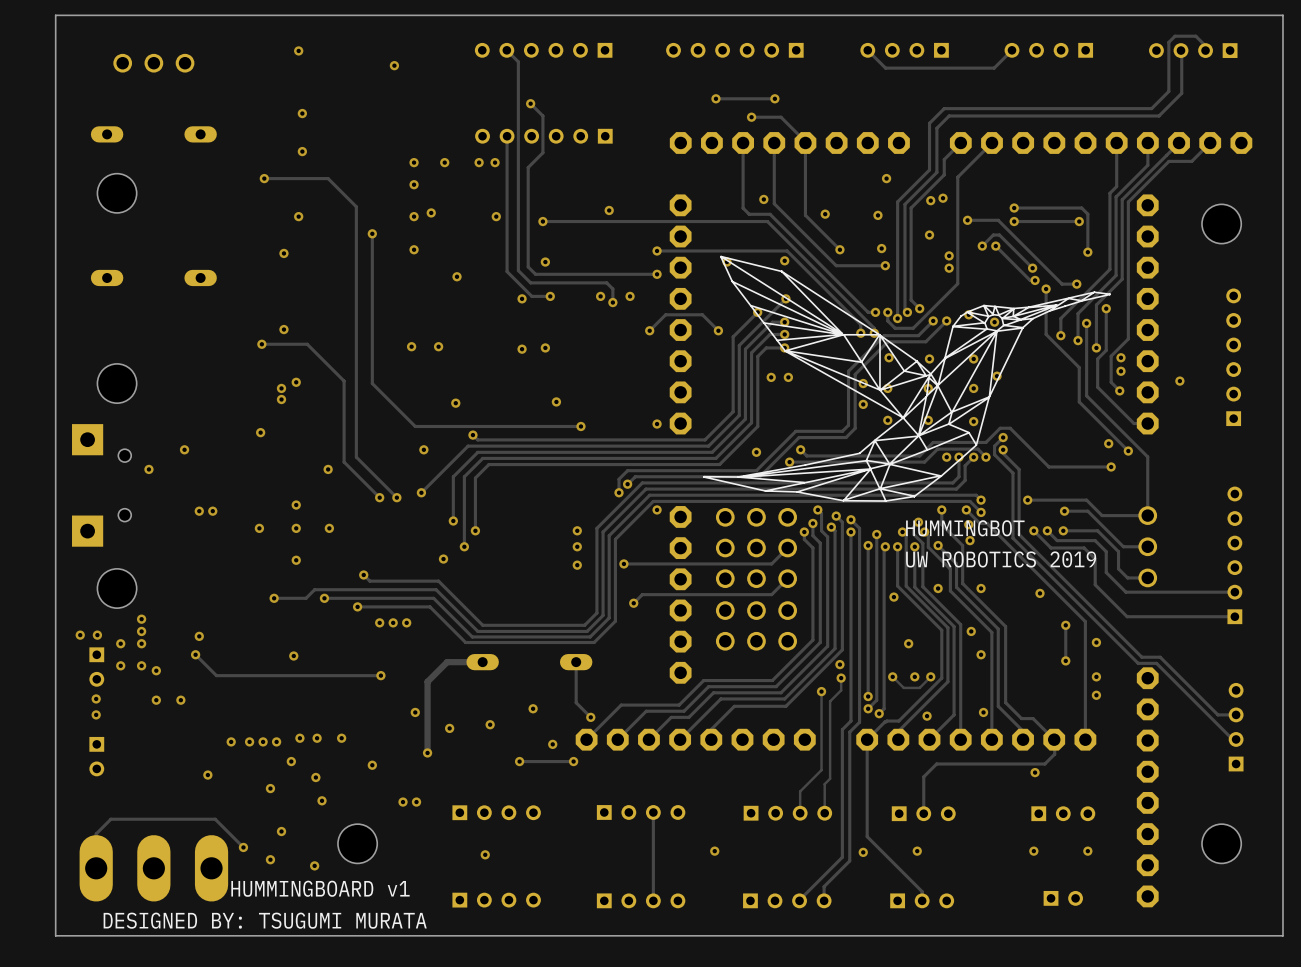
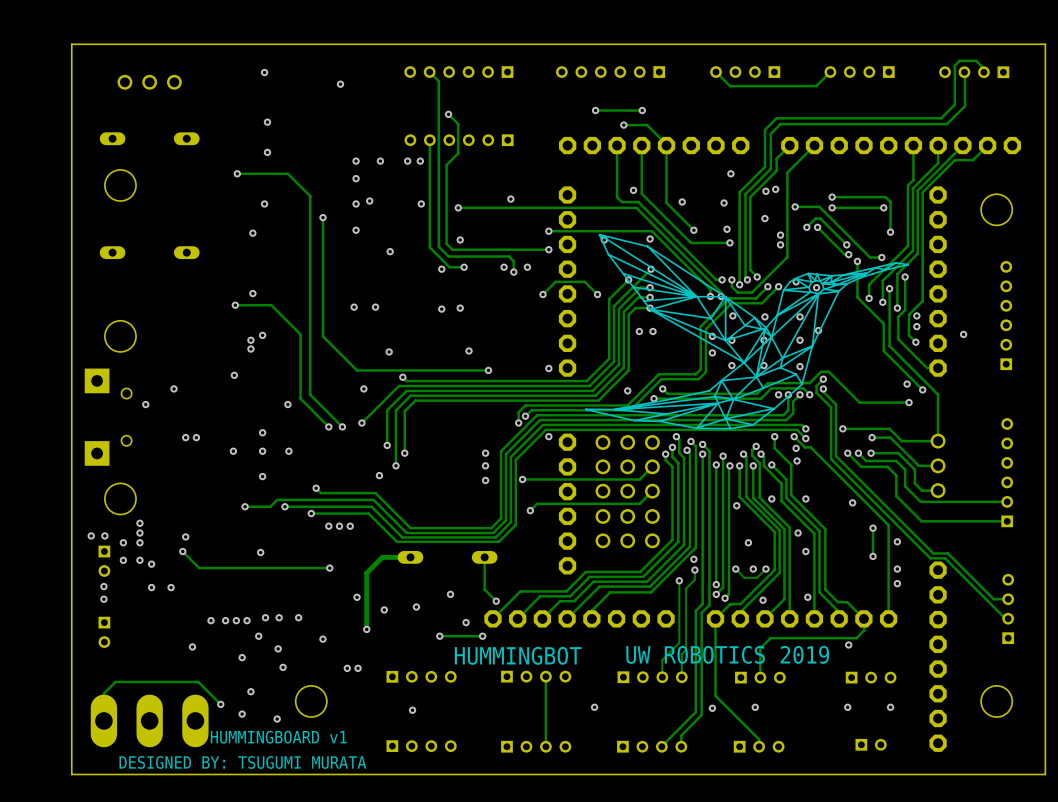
drawing shape: [703, 255, 1111, 568] -> [585, 234, 909, 430]
text: none -> UW ROBOTICS 2019 (727, 654)
text: none -> HUMMINGBOT (518, 655)

